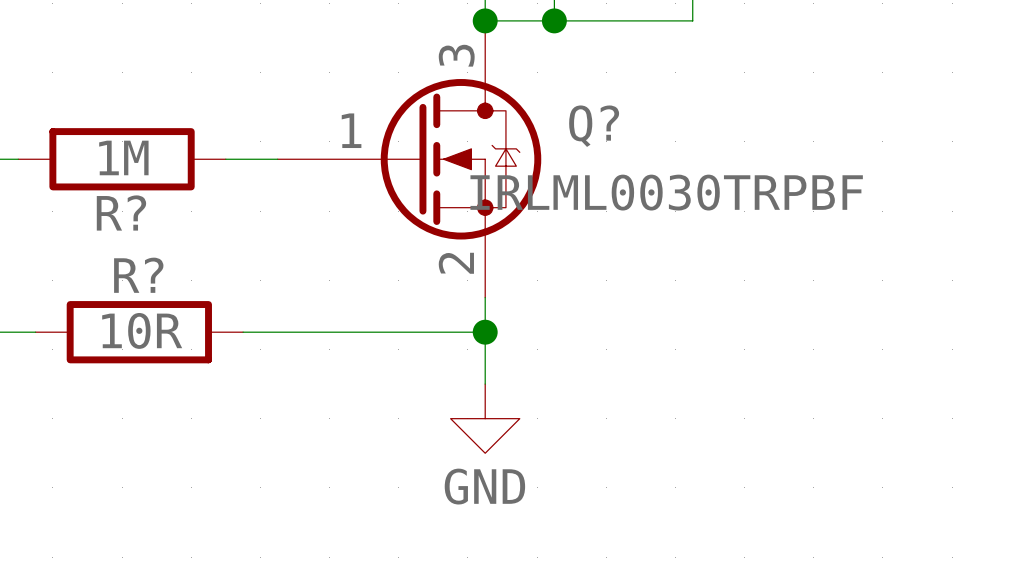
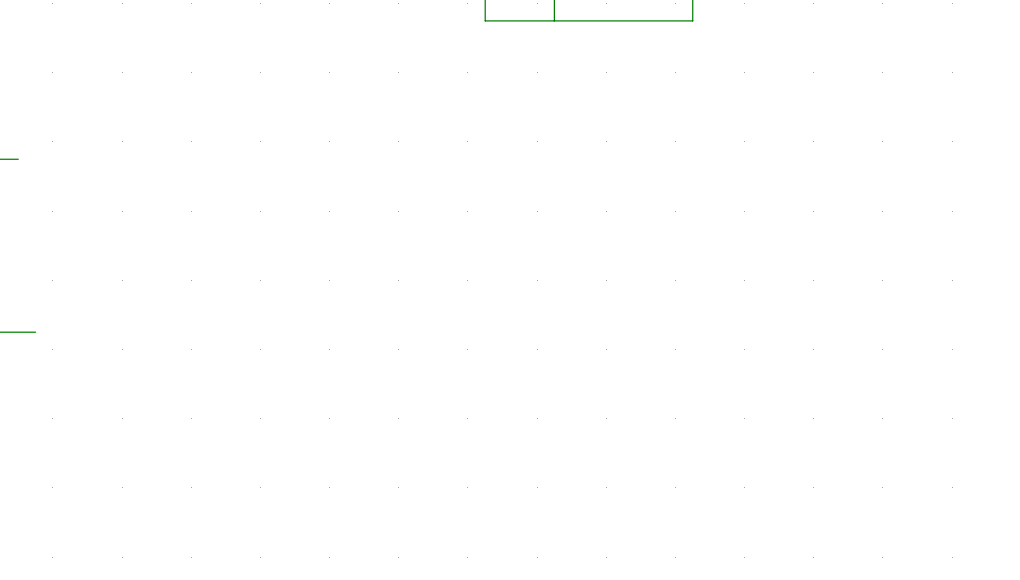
junction: (485, 20) -> none
junction: (554, 20) -> none
R?: 1M (122, 159) -> none
wire: (225, 159) (277, 159) -> none
Q?: IRLML0030TRPBF (409, 159) -> none
wire: (485, 297) (485, 384) -> none
R?: 10R (139, 332) -> none
wire: (243, 332) (485, 332) -> none
junction: (485, 332) -> none
power symbol: GND (485, 418) -> none

